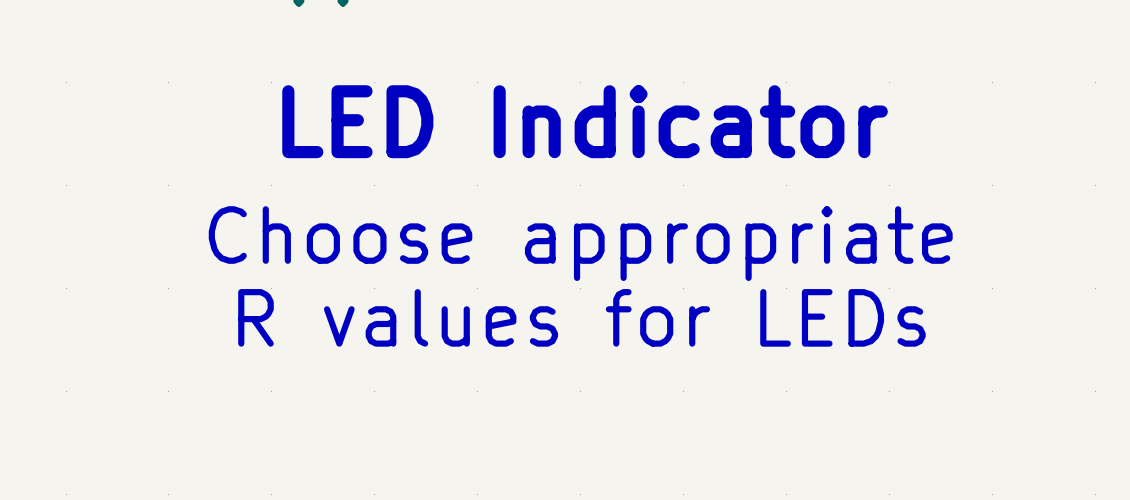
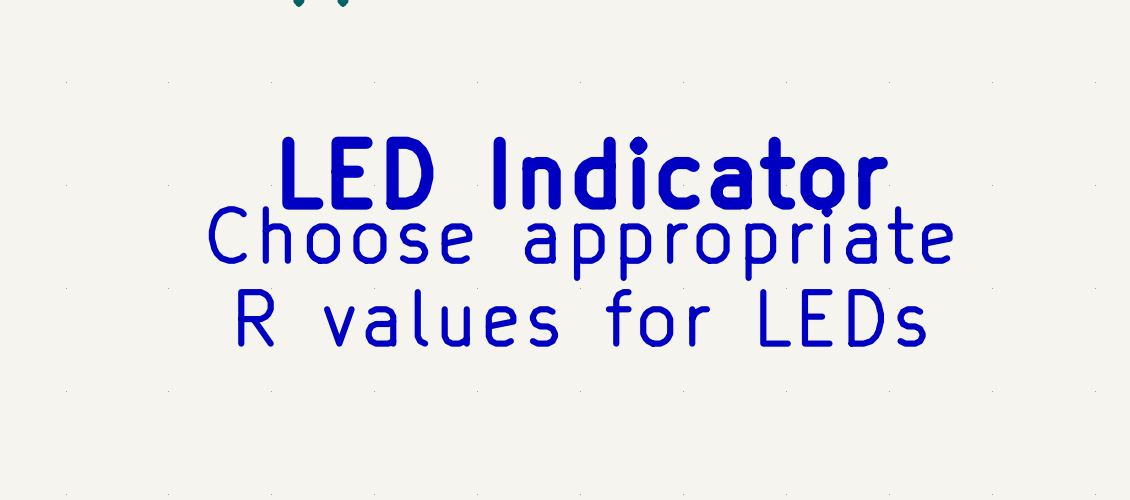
text position: LED Indicator (585, 121) -> LED Indicator (585, 173)

